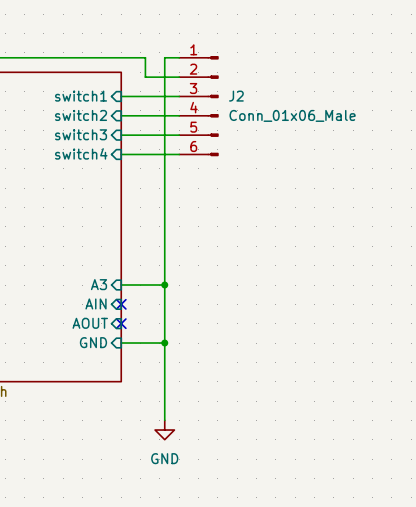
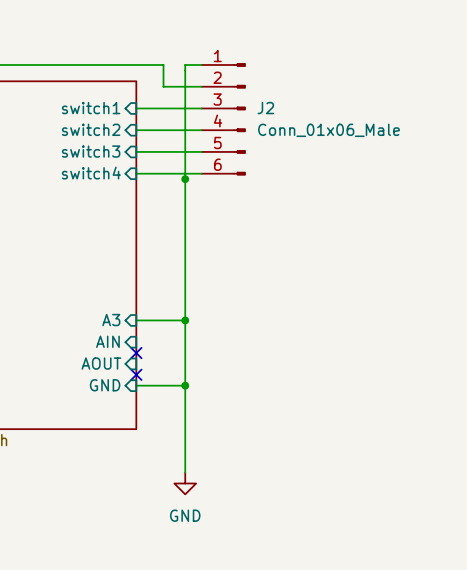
junction: none -> (185, 179)
no-connect mark: (121, 304) -> none
no-connect mark: none -> (136, 353)
no-connect mark: (121, 323) -> none
no-connect mark: none -> (136, 374)

